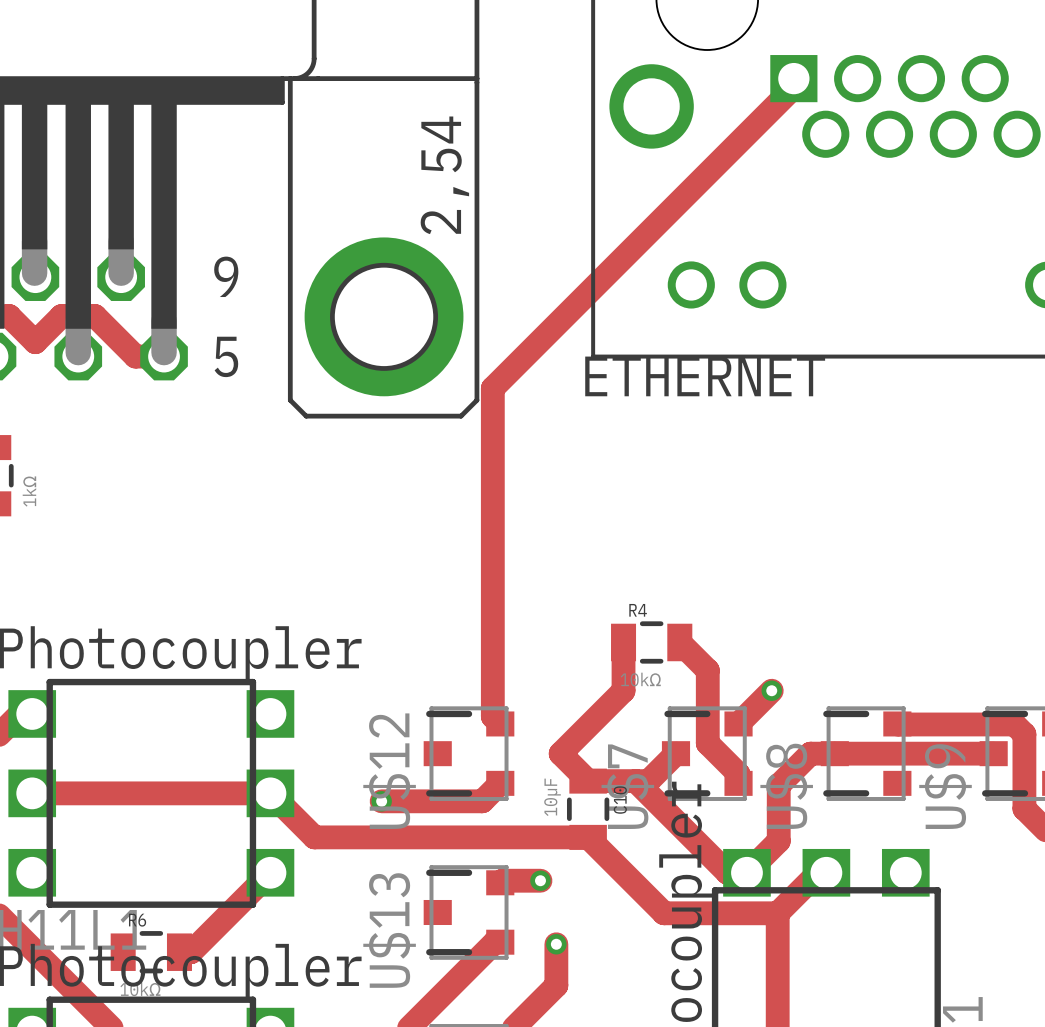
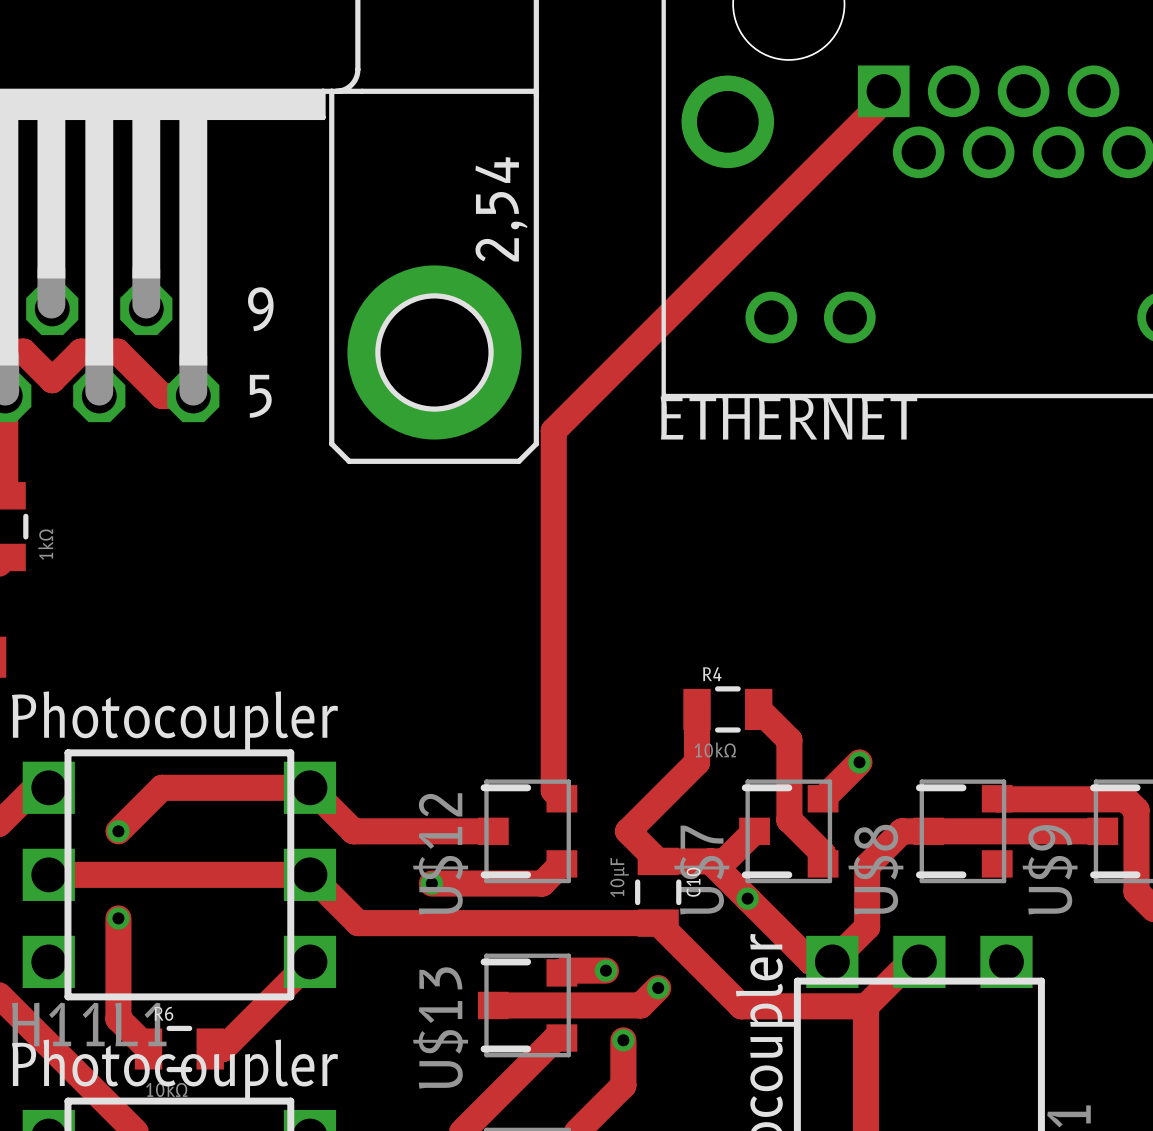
track: none -> (118, 831) (161, 787) (309, 787) (353, 831) (493, 831)
via: none -> (118, 831)
via: none -> (747, 898)
track: none -> (118, 918) (118, 1018) (148, 1048)
via: none -> (118, 918)
track: none -> (658, 988) (640, 1005) (493, 1005)
via: none -> (658, 988)

